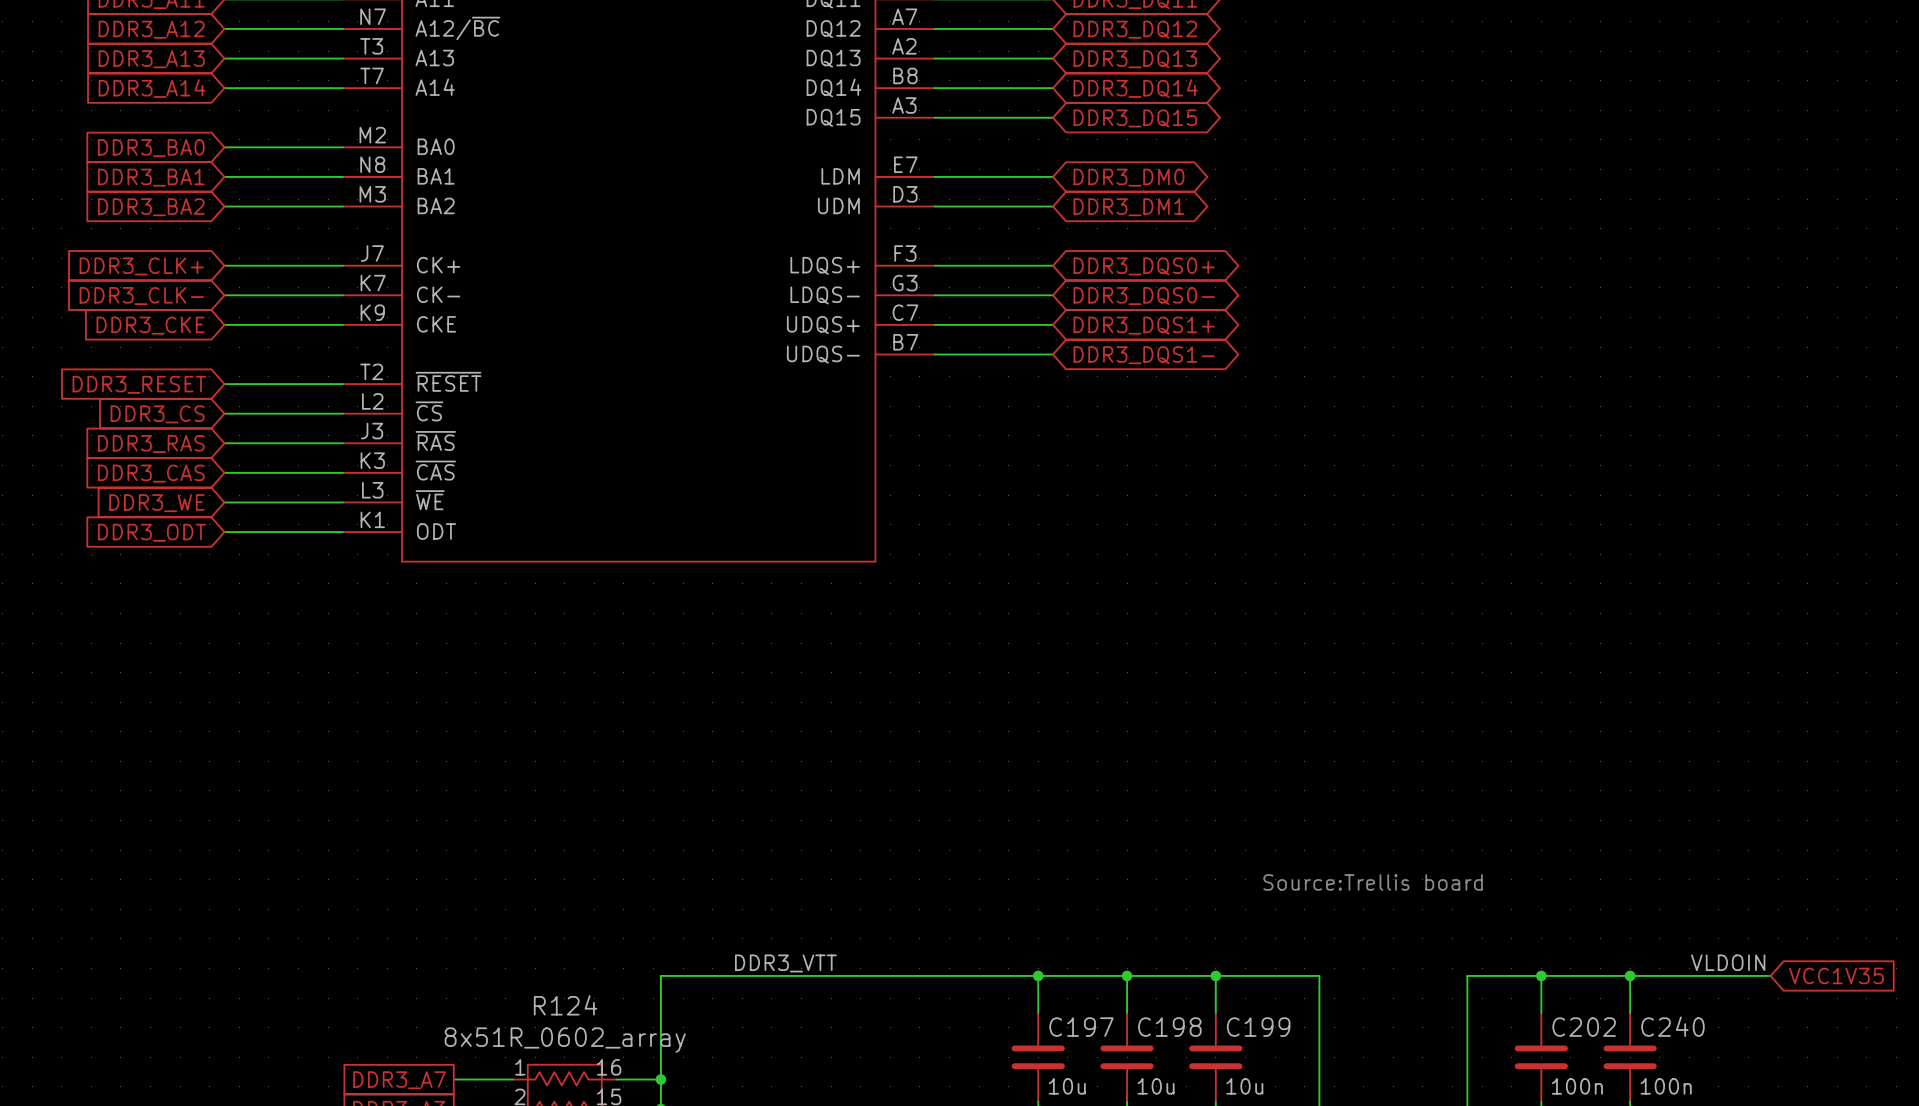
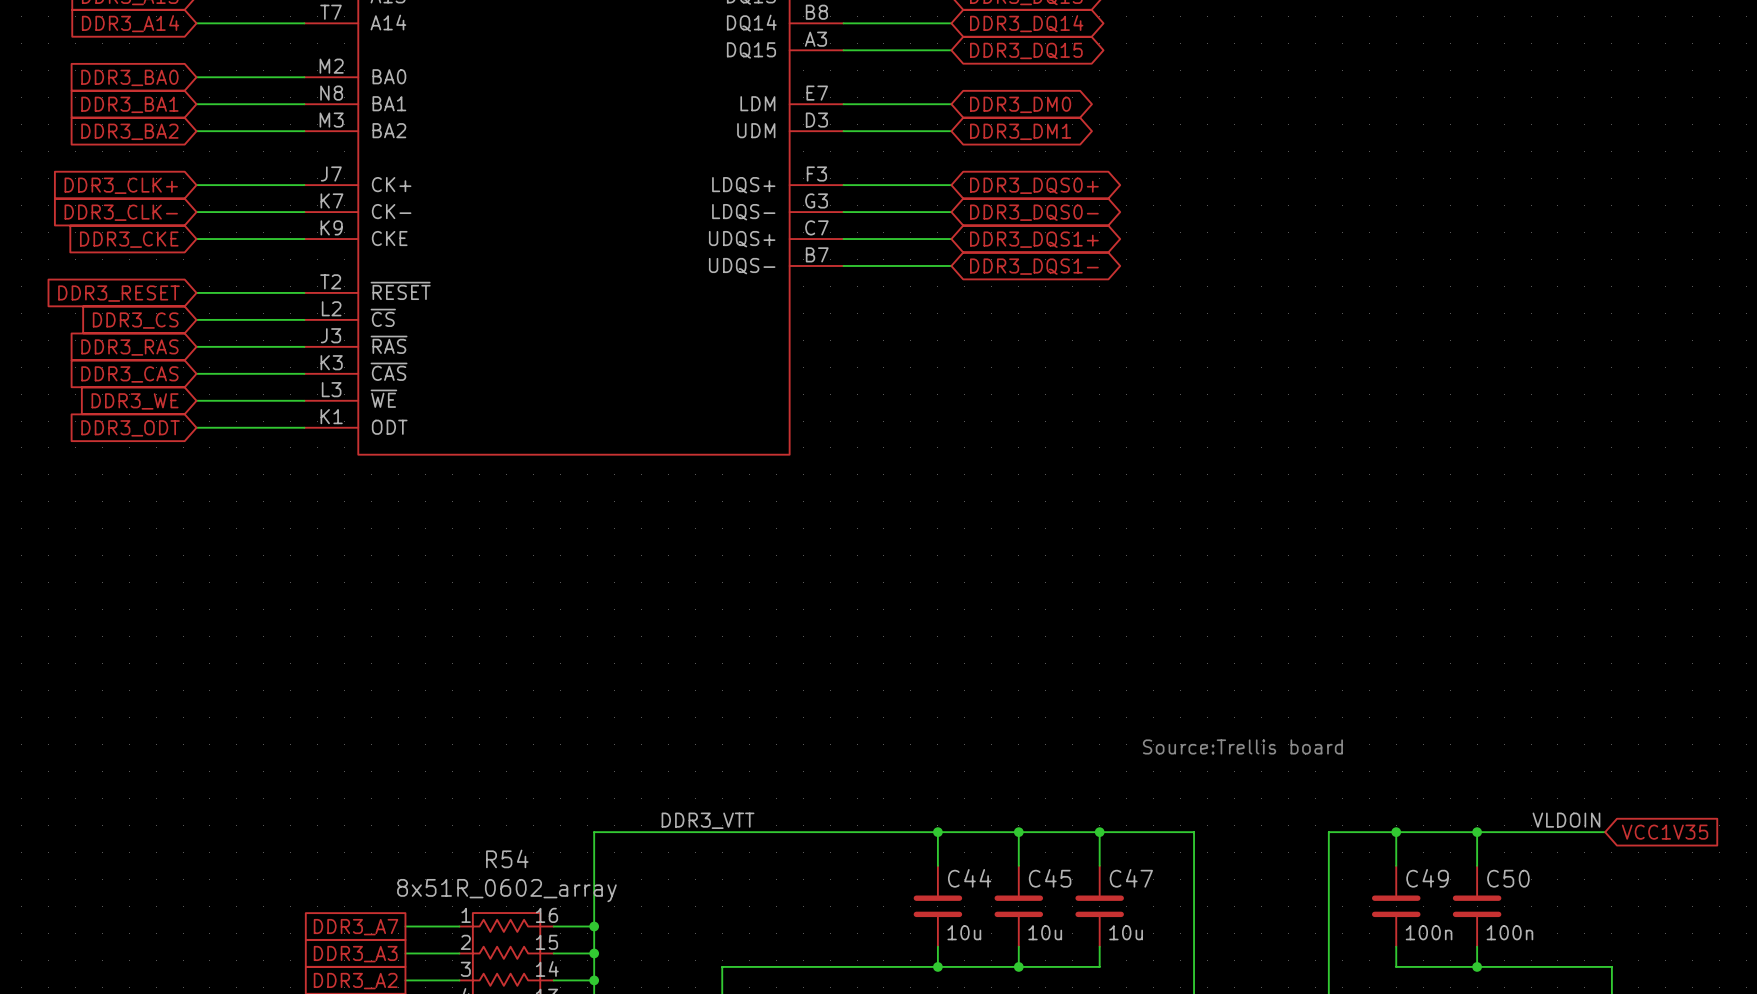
R124 name: R124 (565, 1005) -> R54 (507, 858)
C240 name: C240 (1672, 1026) -> C50 (1508, 878)
C197 name: C197 (1081, 1027) -> C44 (969, 878)
C198 name: C198 (1169, 1027) -> C45 (1050, 878)
C199 name: C199 (1258, 1027) -> C47 (1131, 878)
C202 name: C202 (1584, 1027) -> C49 (1427, 878)

